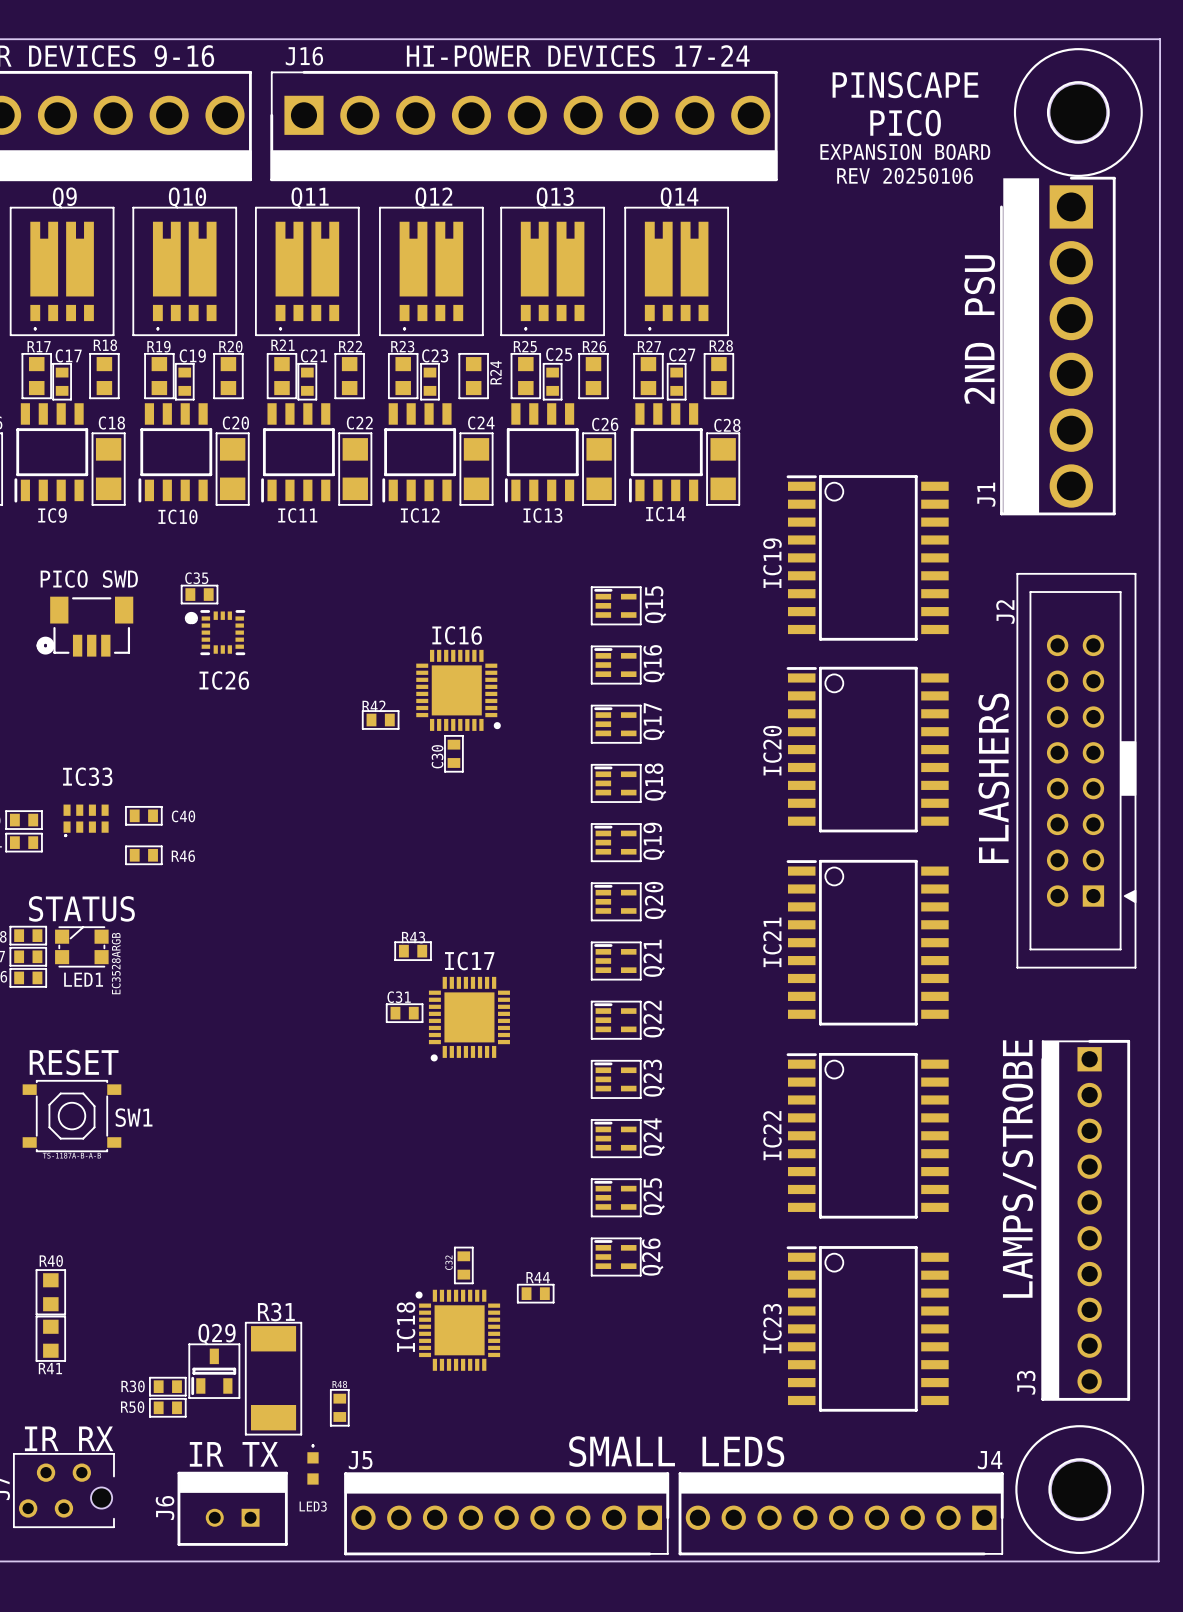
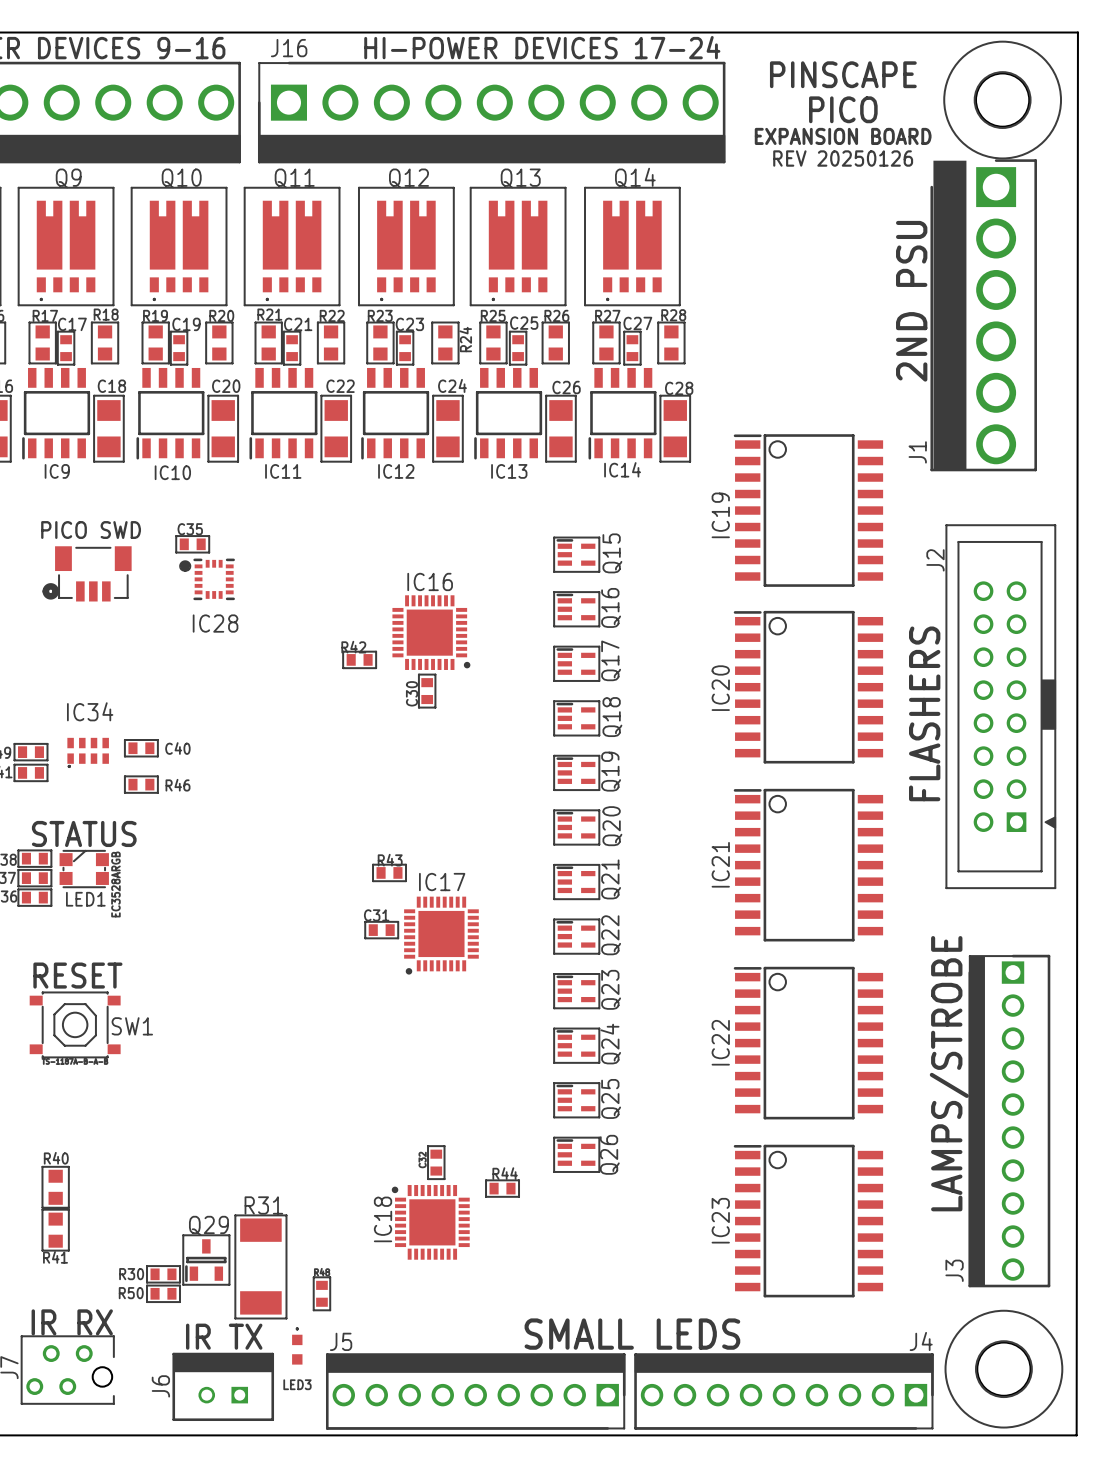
text: REV 20250106 (905, 175) -> REV 20250126 (843, 158)
IC26 name: IC26 (224, 680) -> IC28 (215, 623)
IC33 name: IC33 (87, 776) -> IC34 (90, 711)

